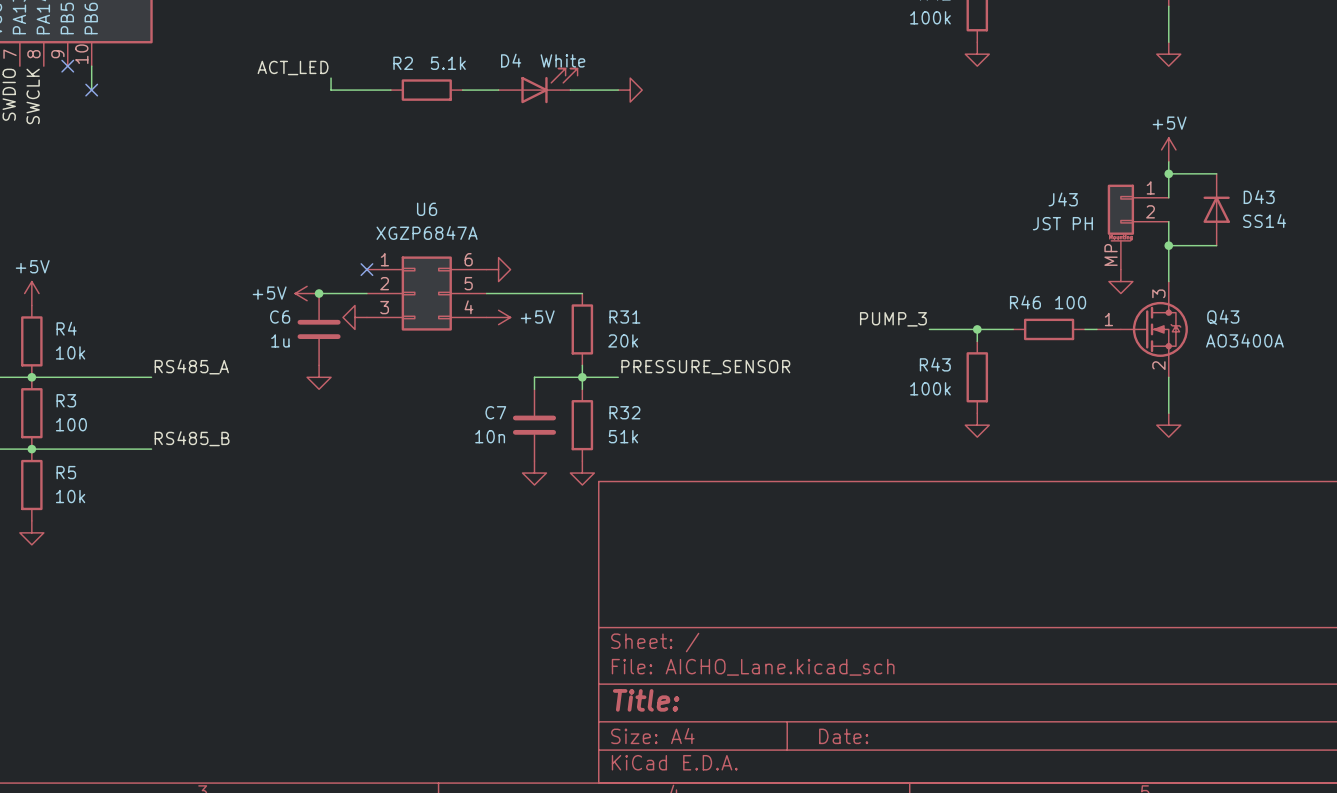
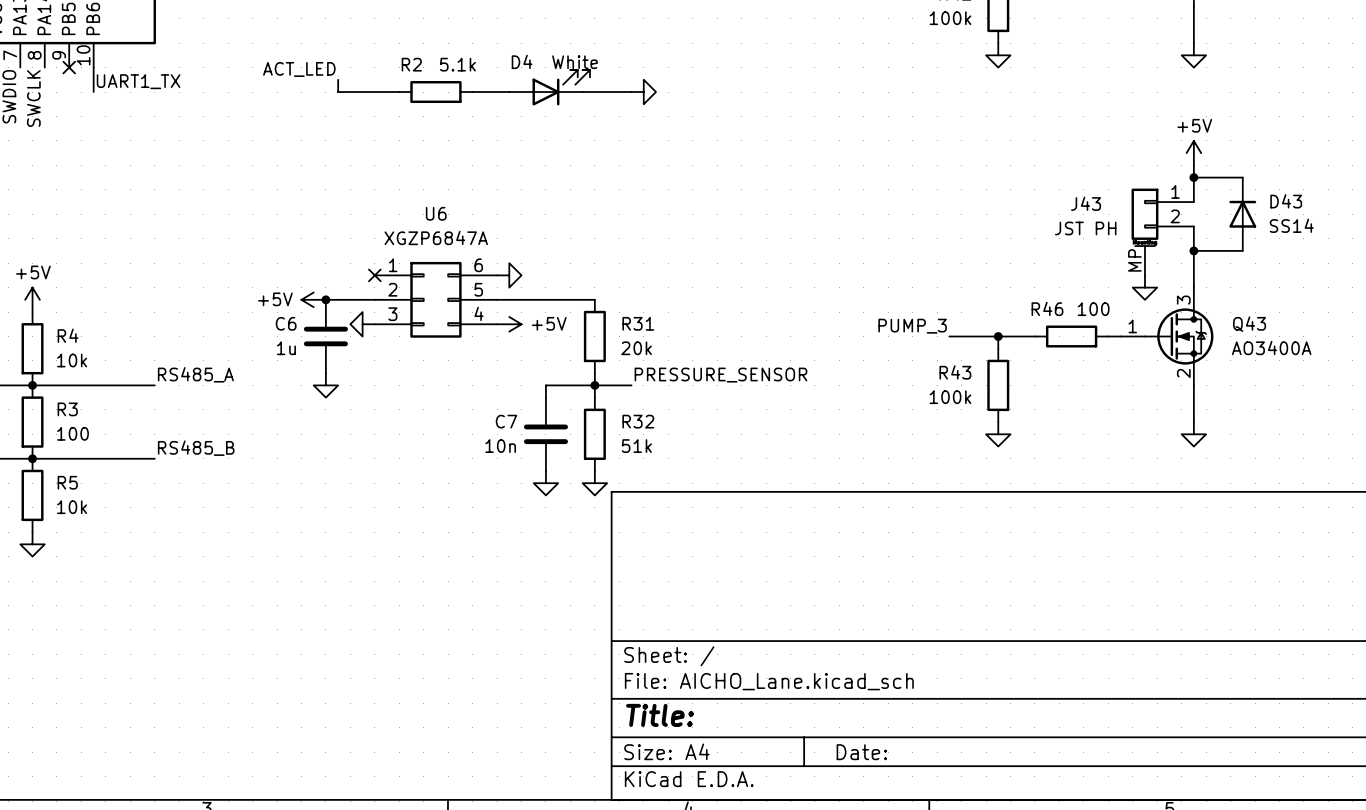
label: none -> UART1_TX (138, 81)
no-connect mark: (91, 90) -> none

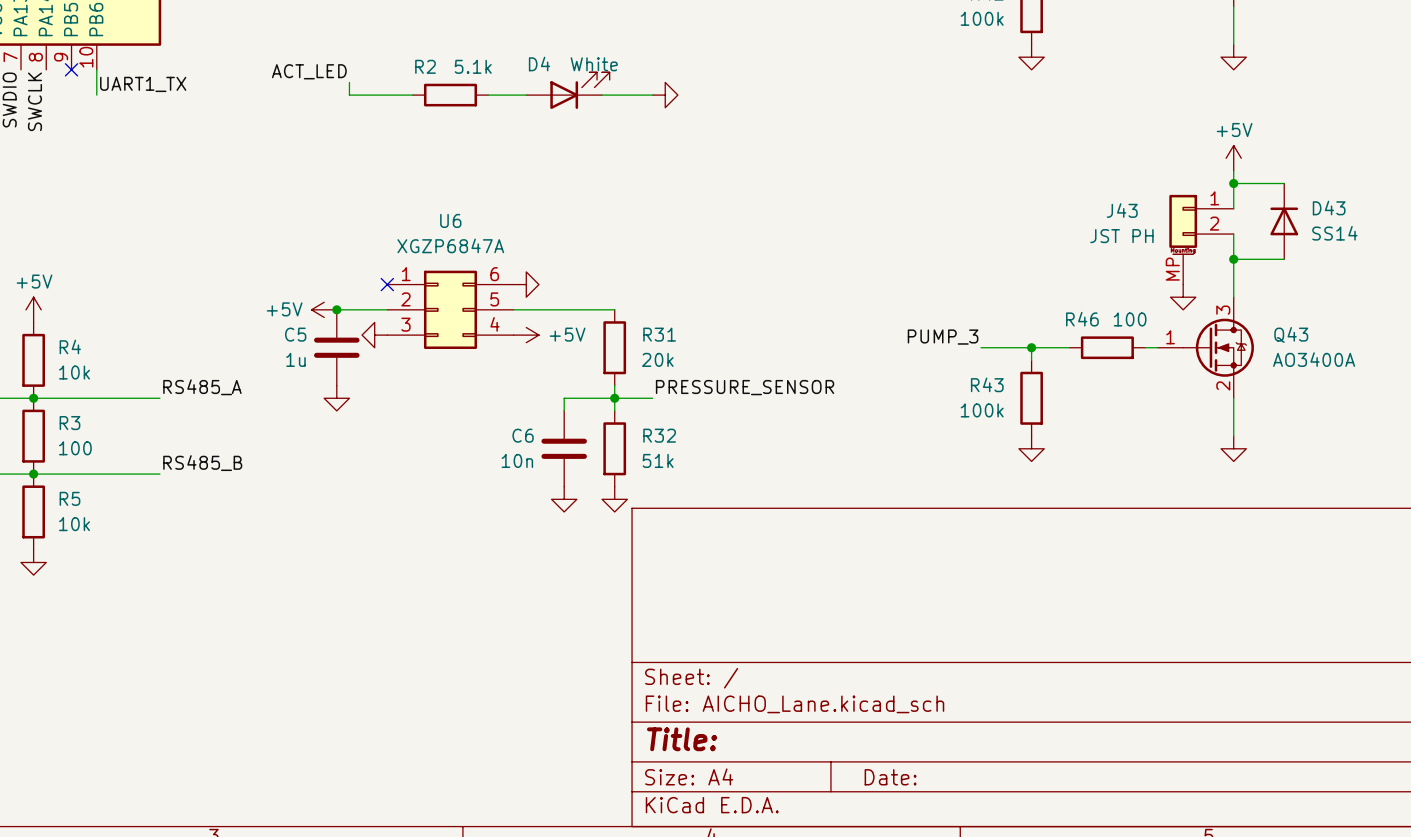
C6 name: C6 (286, 323) -> C5 (295, 334)
C7 name: C7 (506, 421) -> C6 (523, 435)

